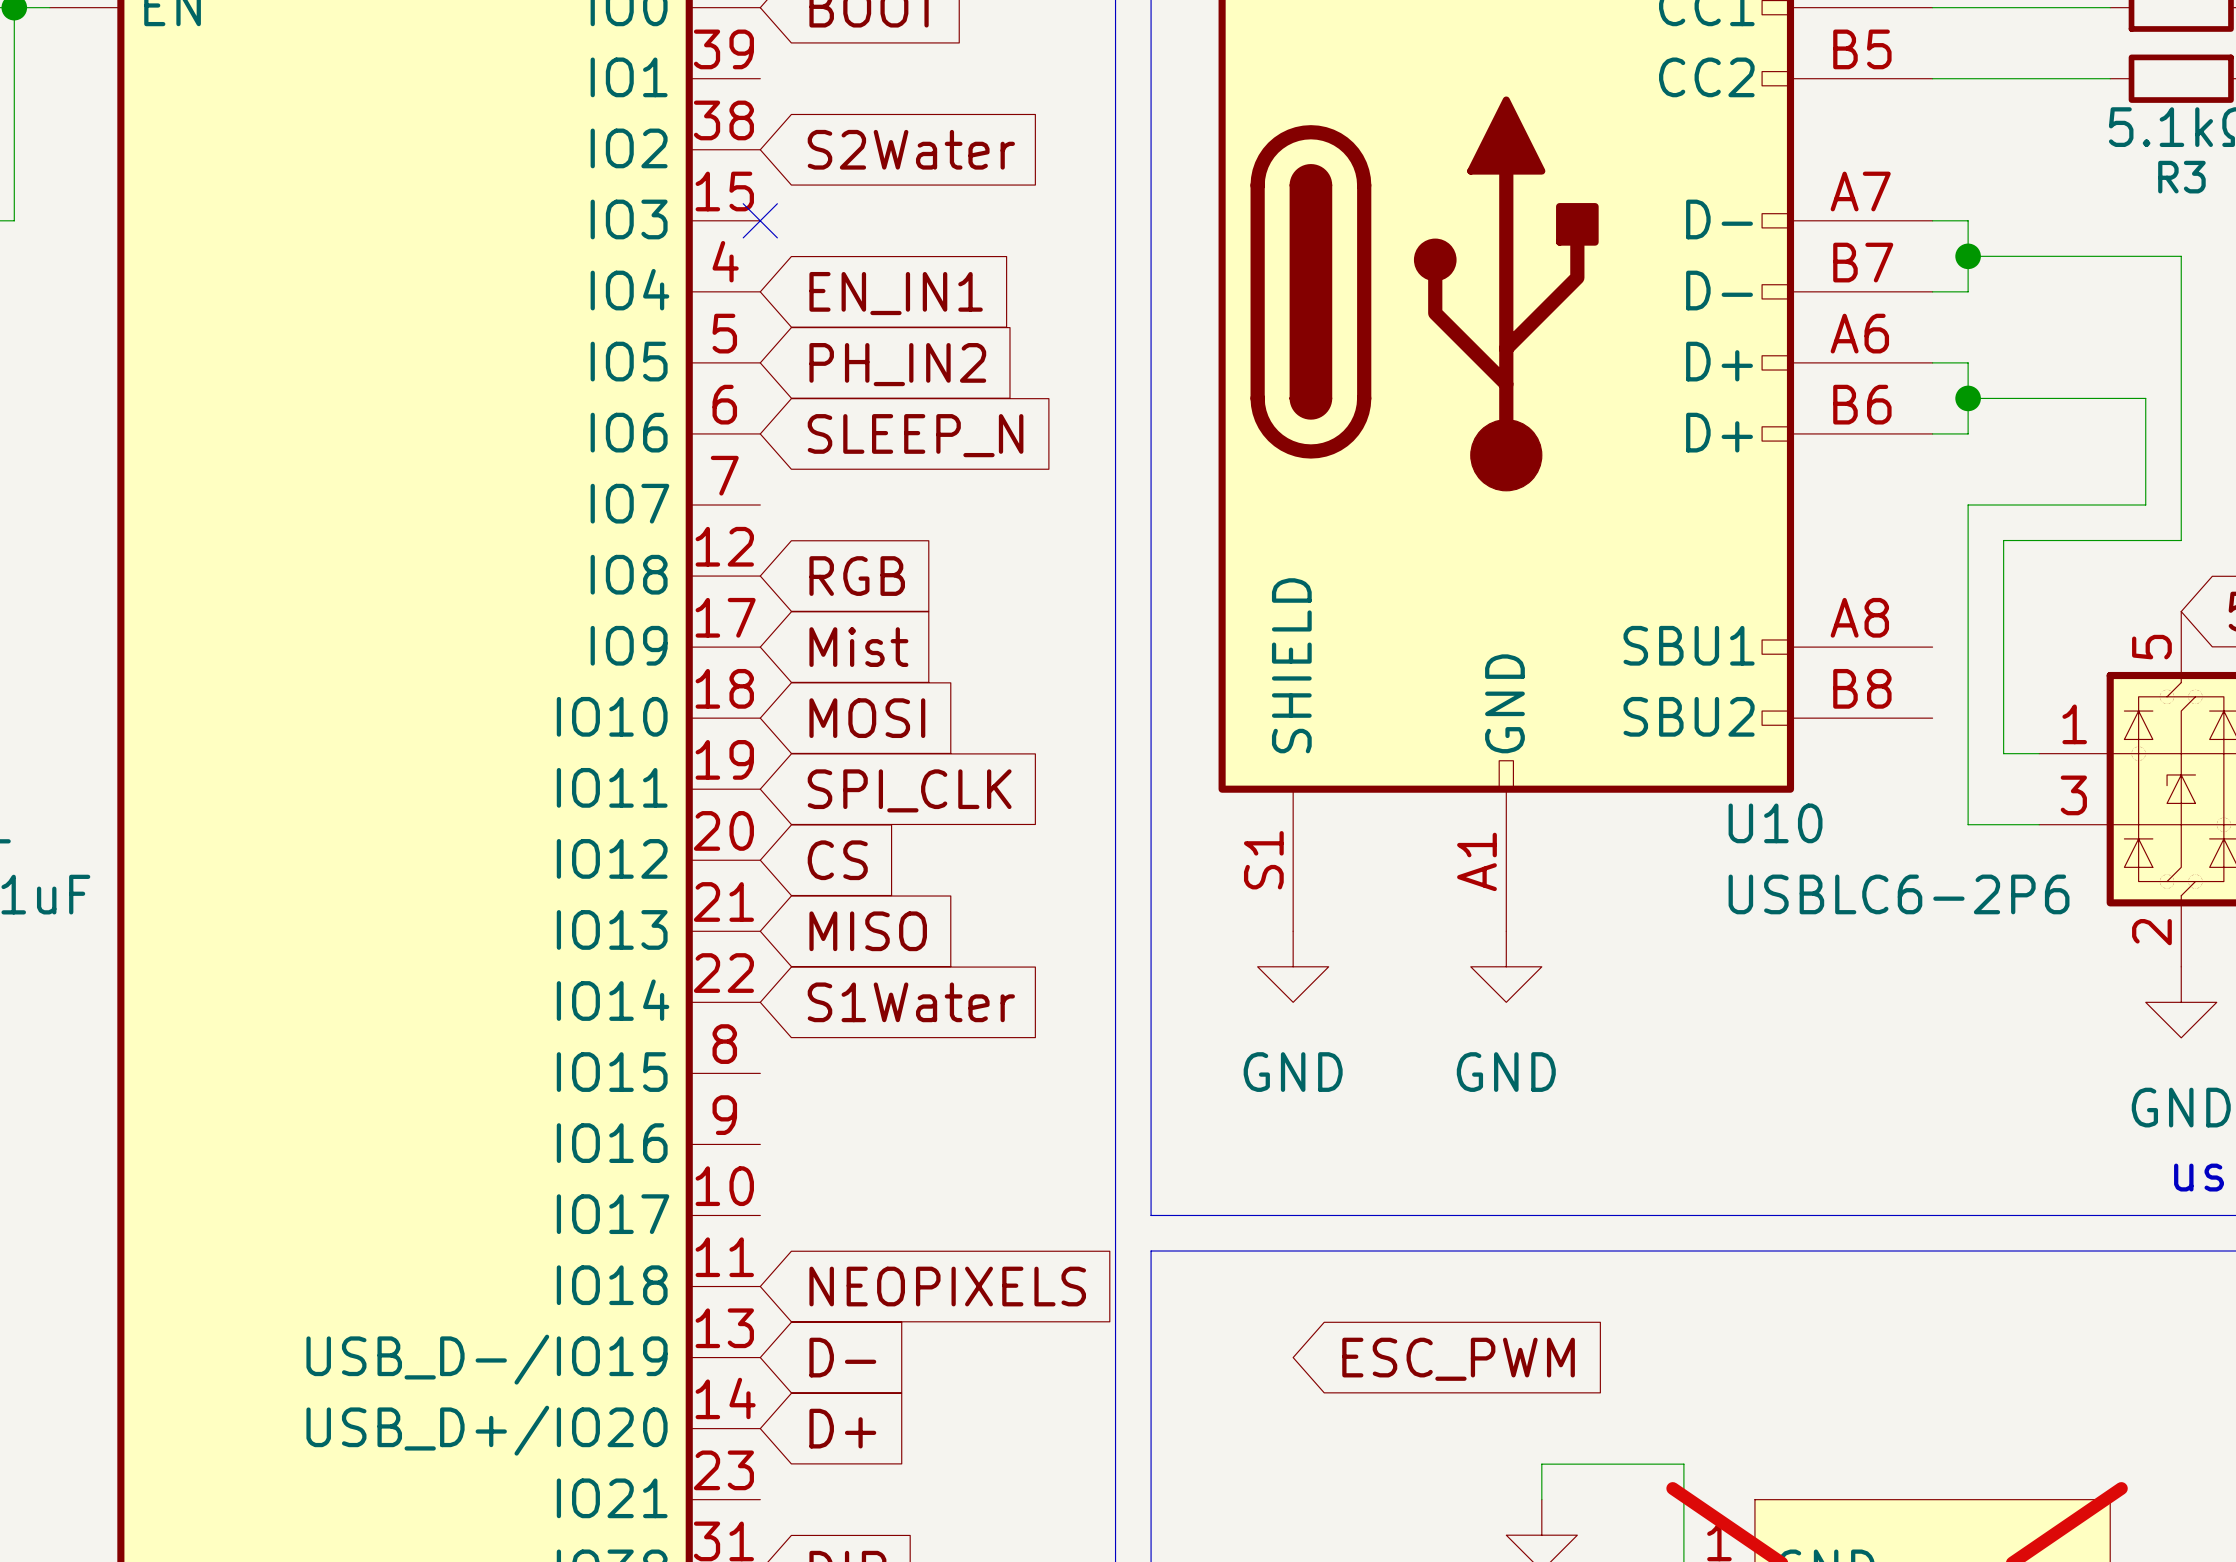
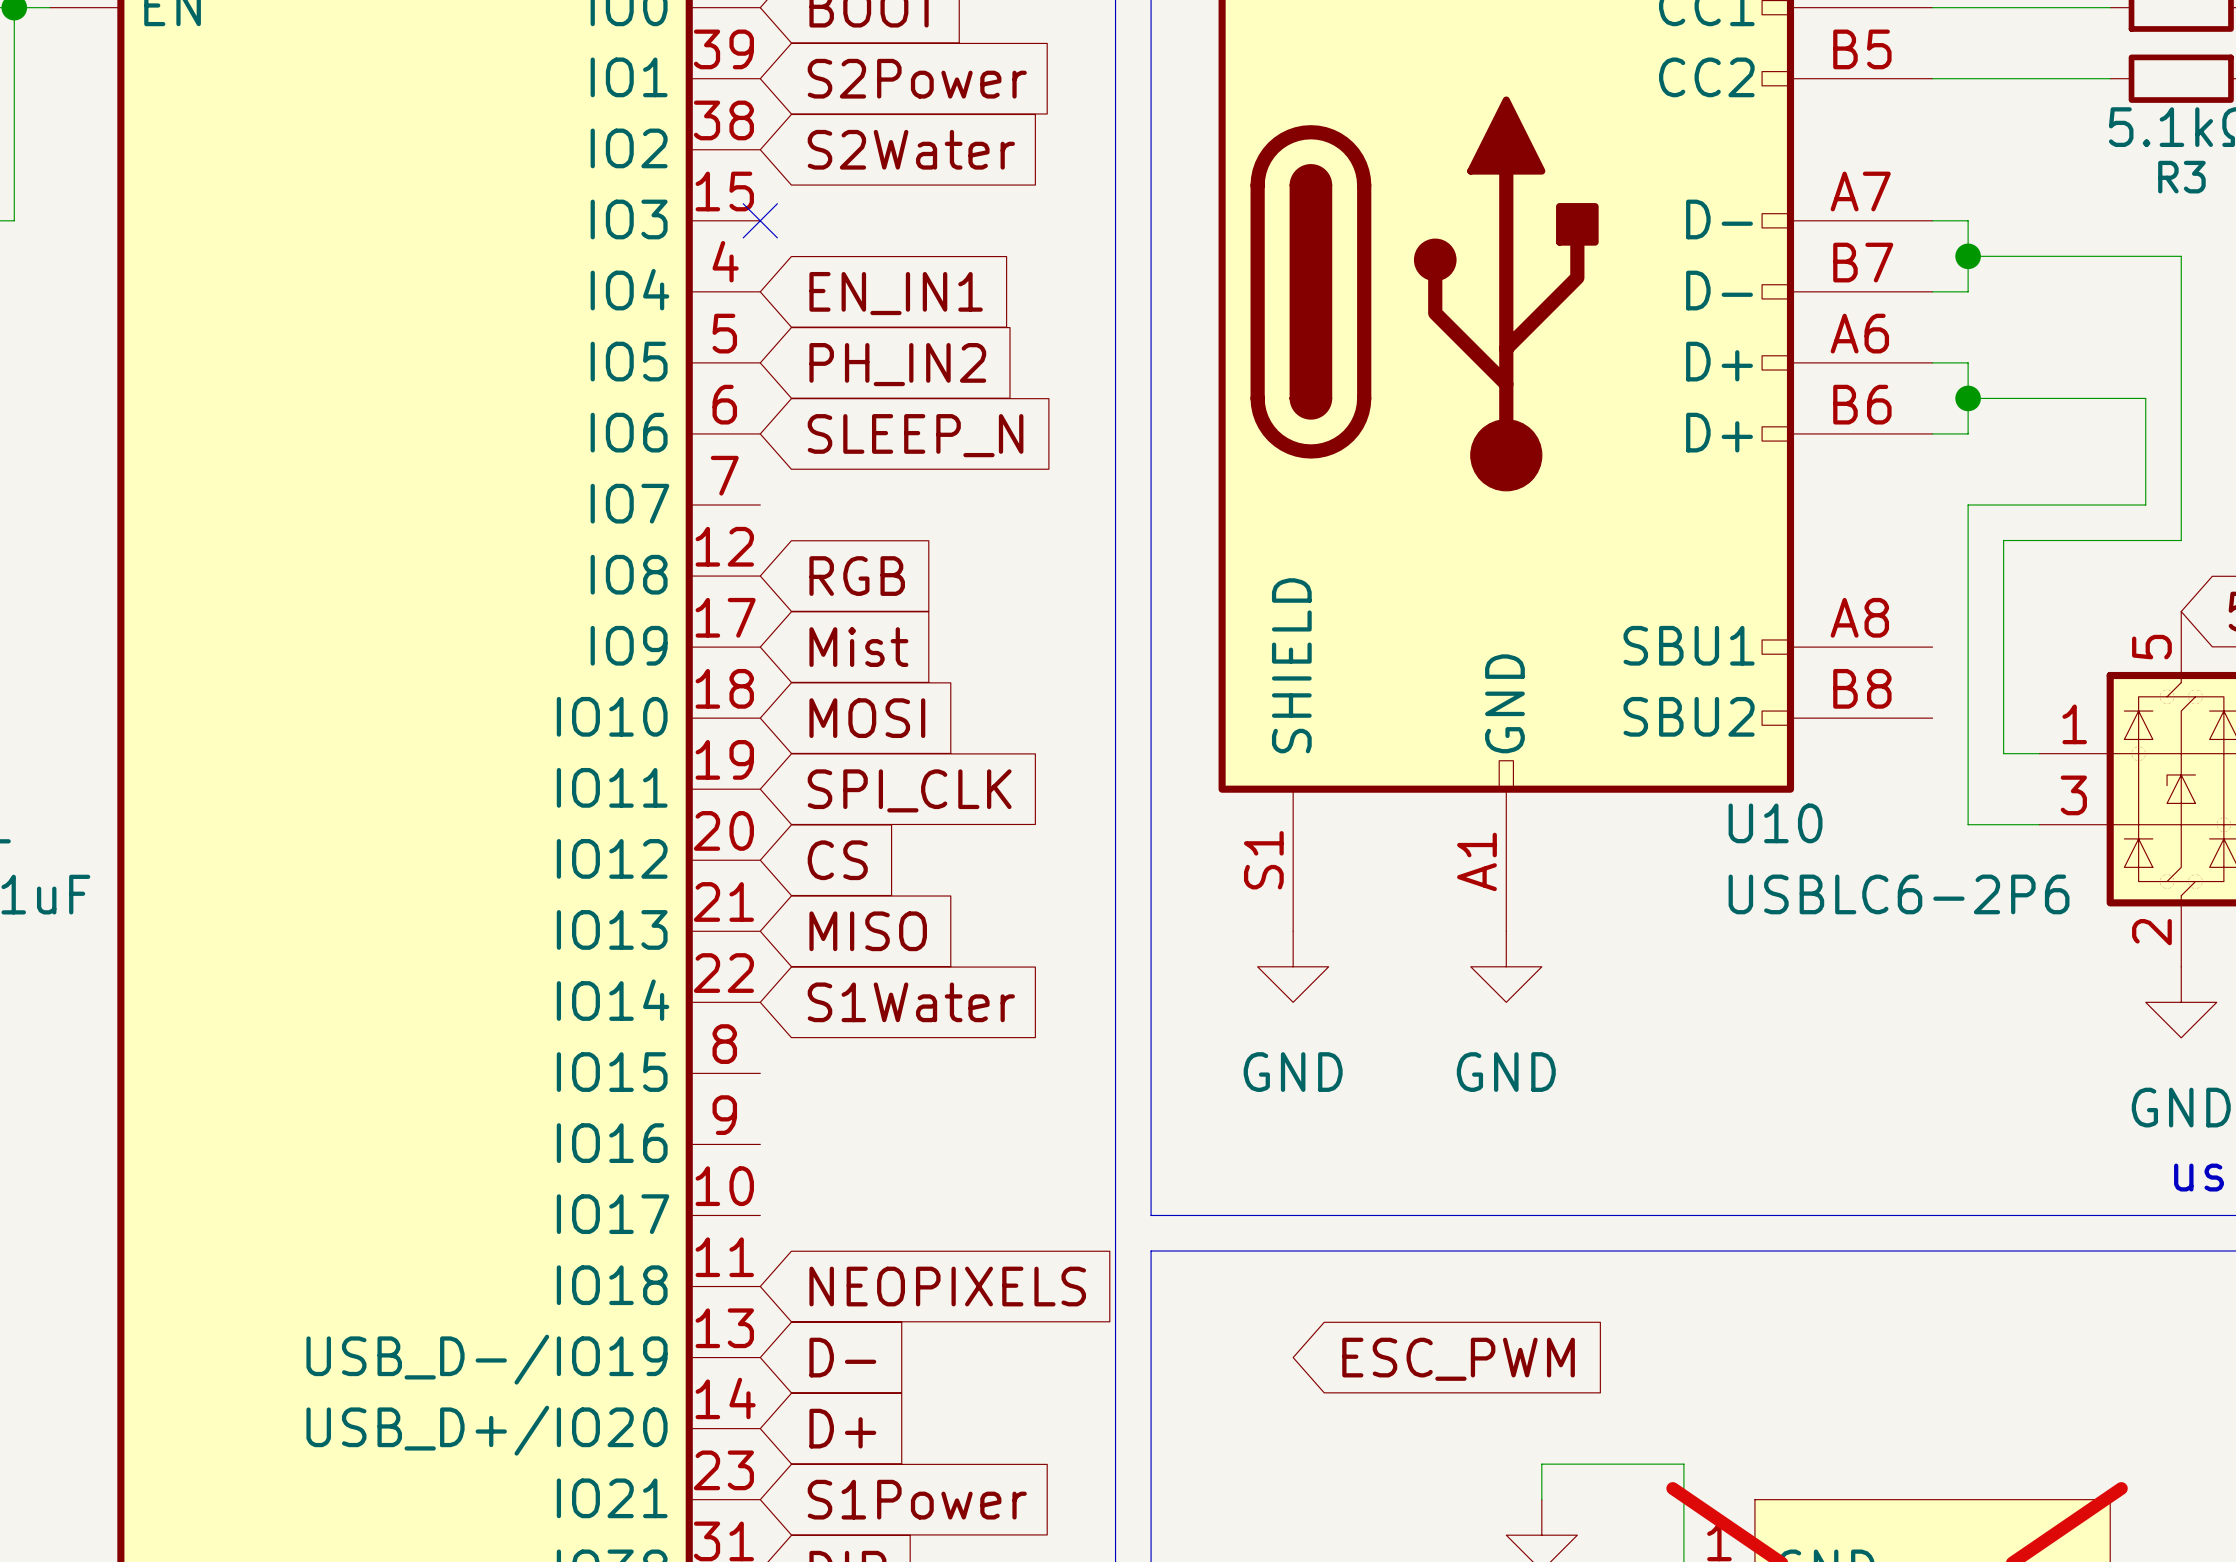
global label: none -> S2Power (917, 78)
global label: none -> S1Power (917, 1499)

